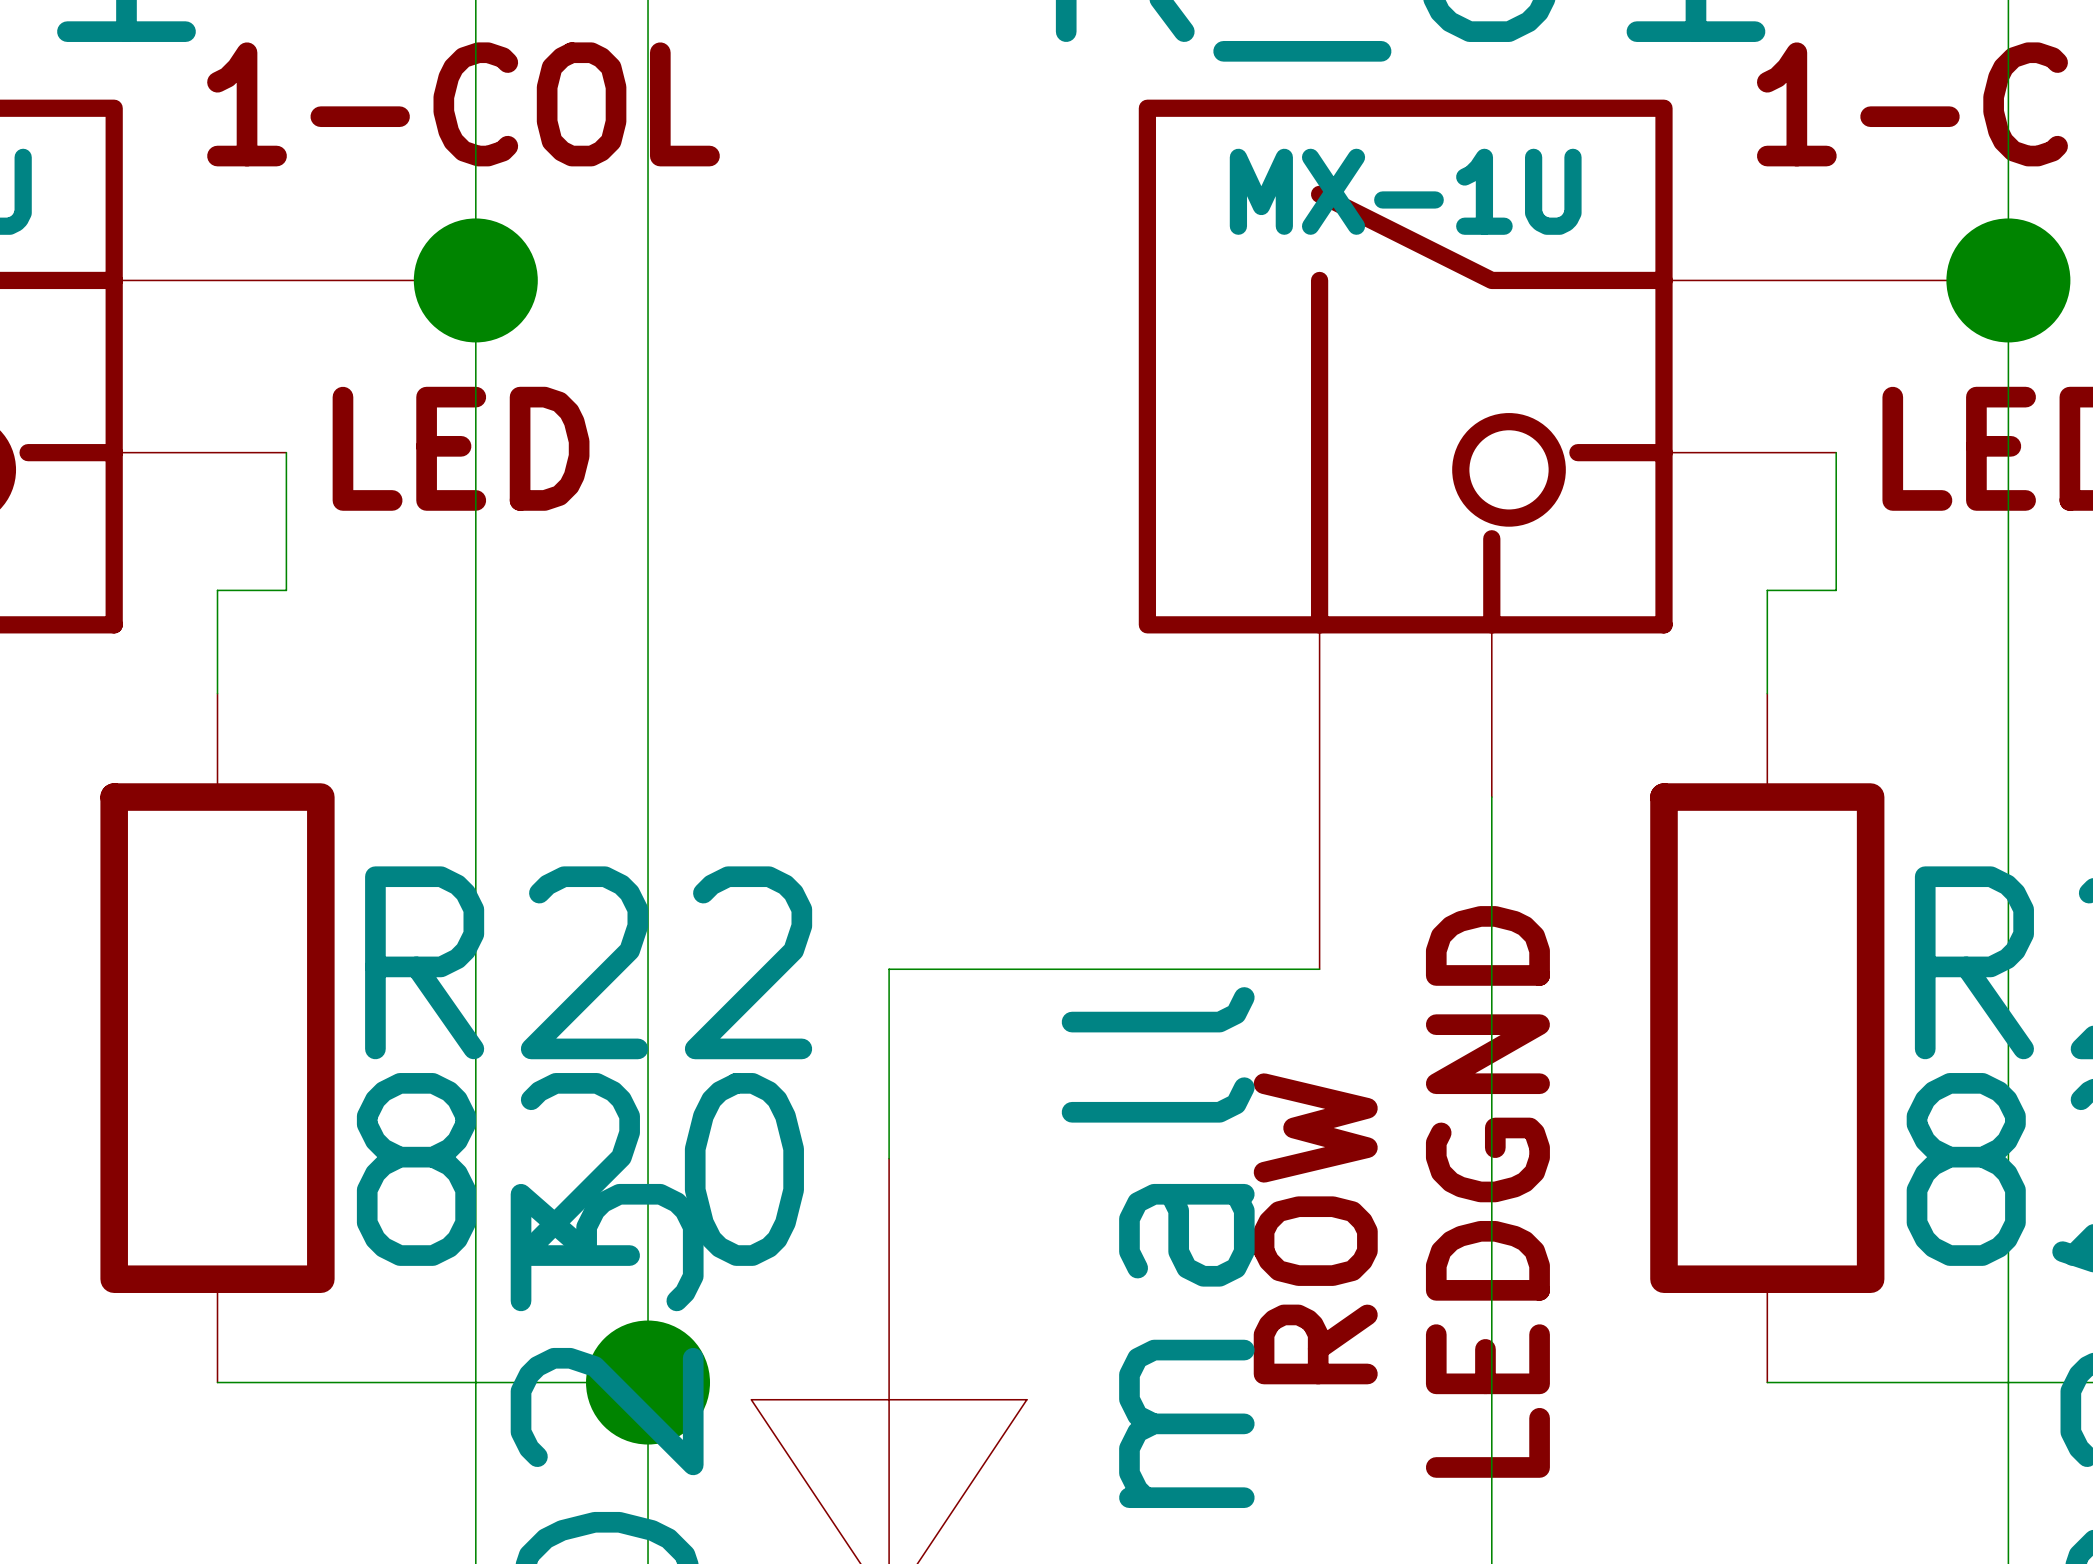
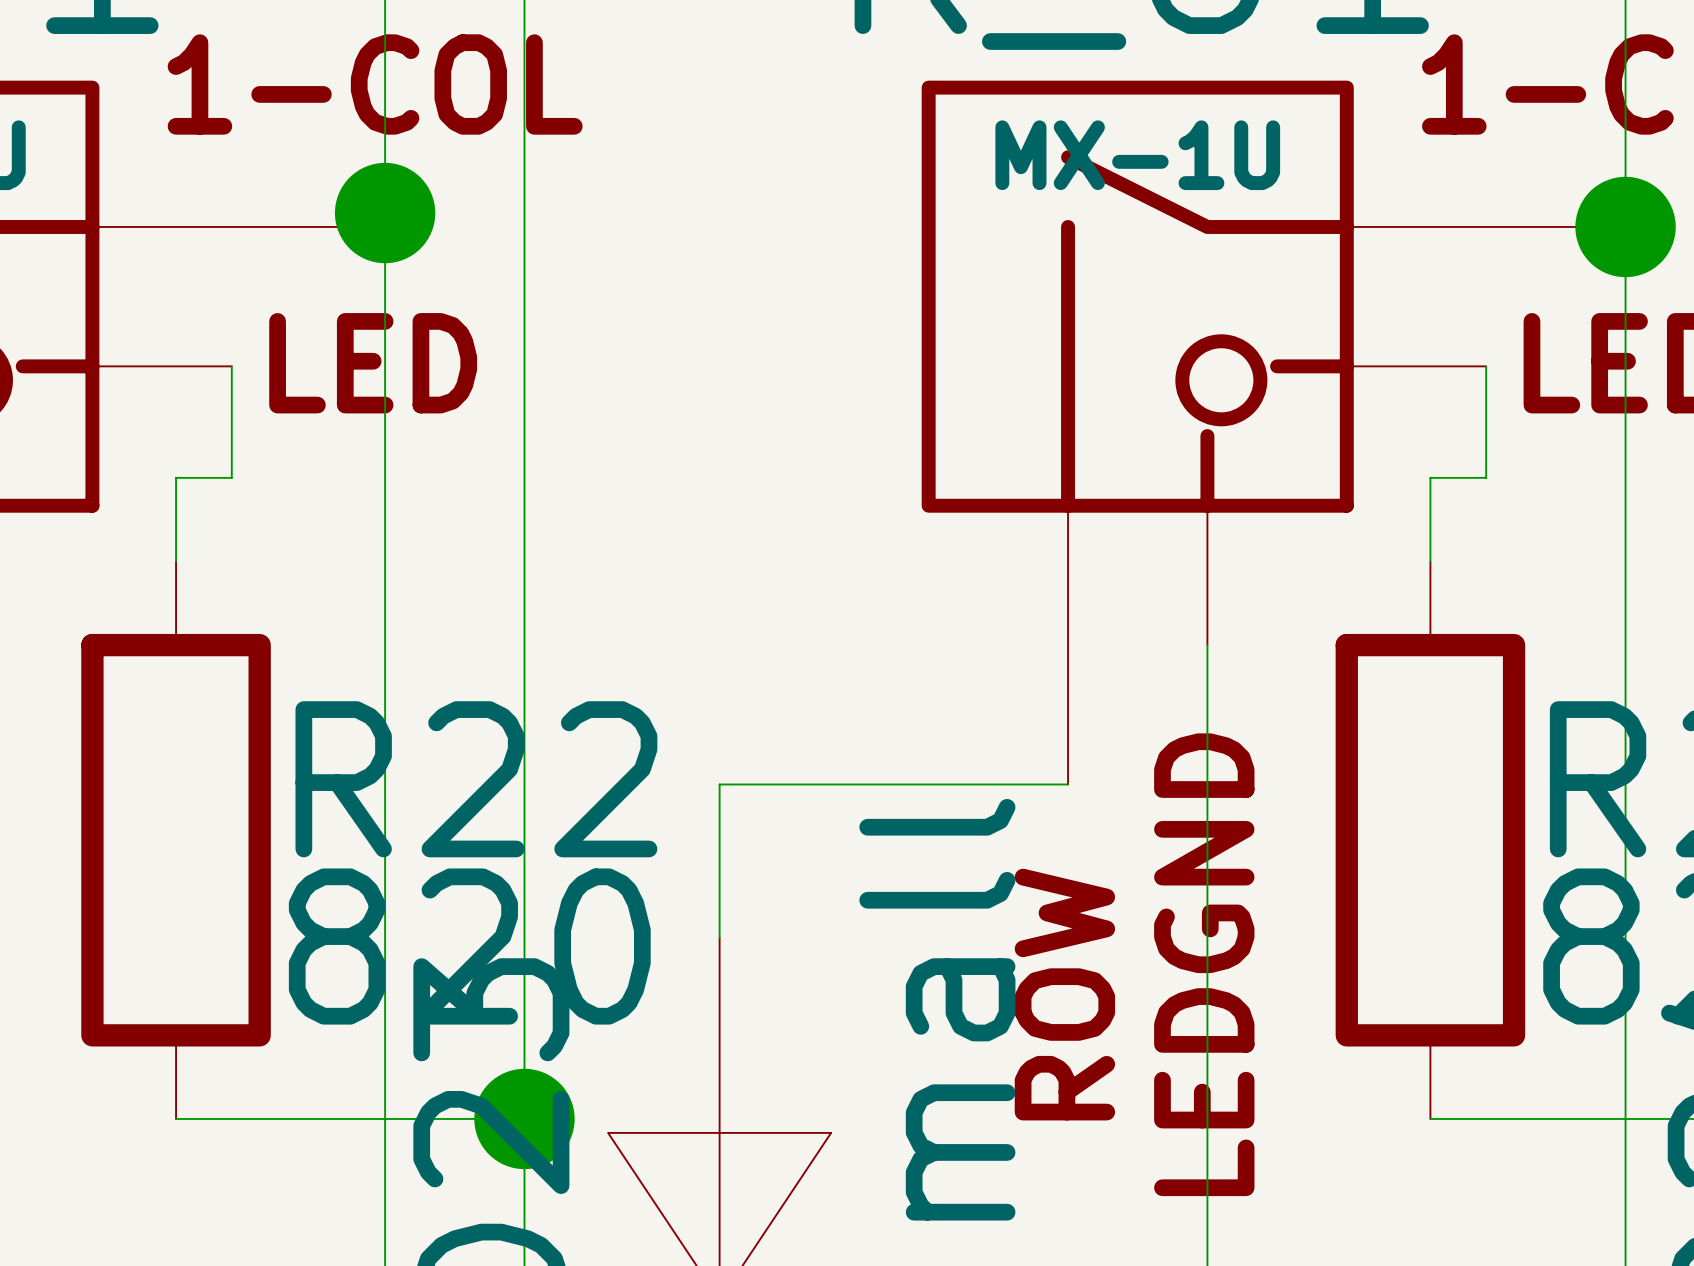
junction position: (475, 280) -> (385, 213)

